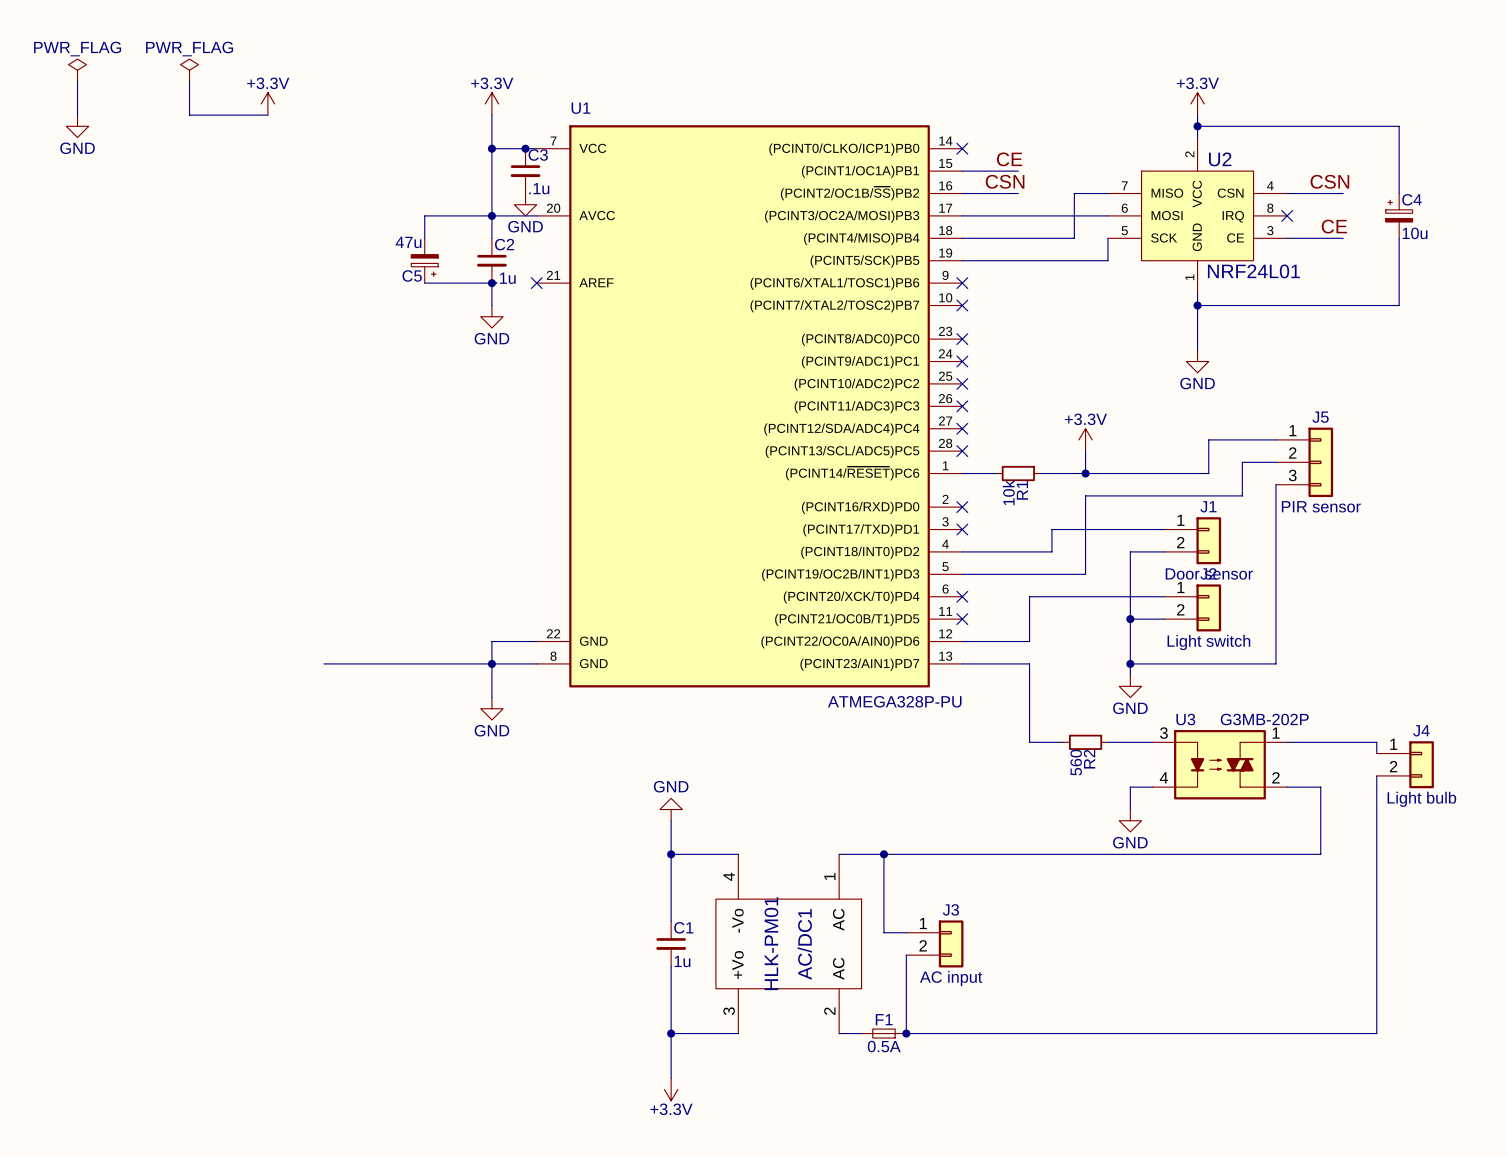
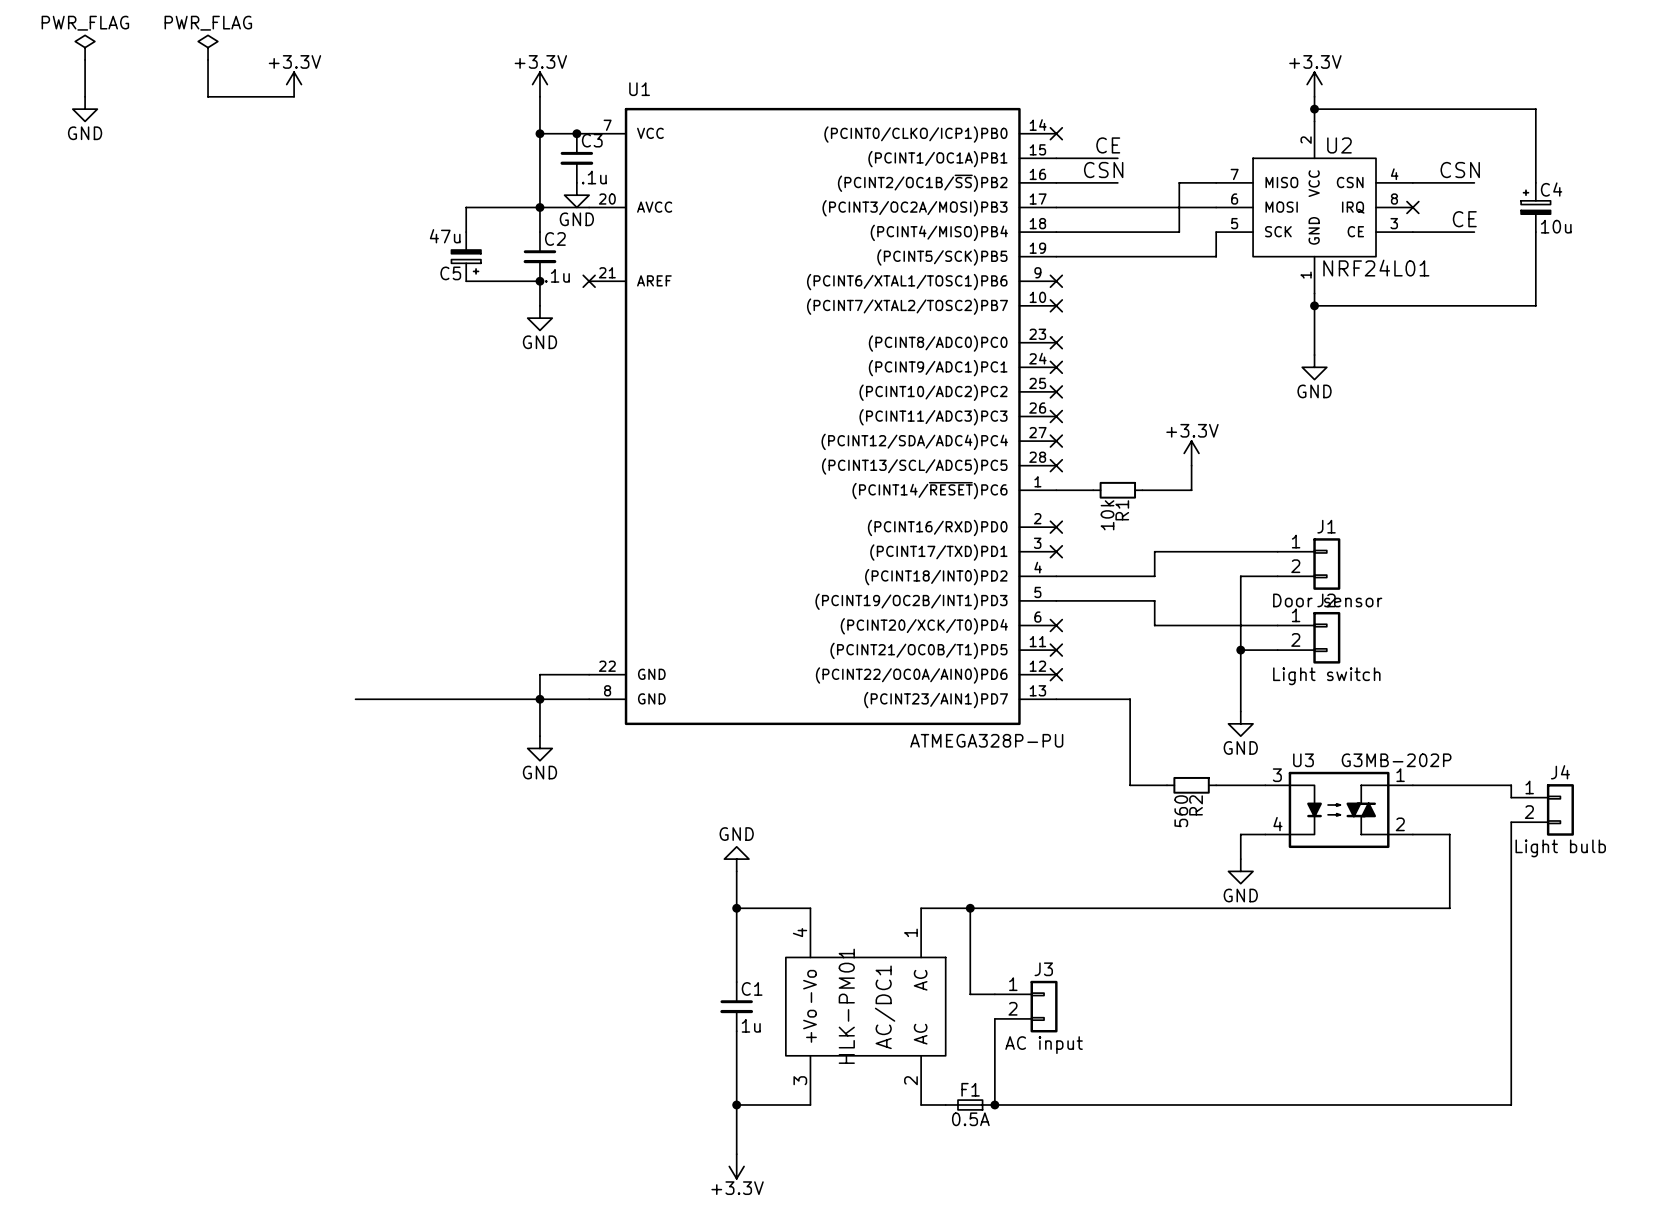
wire: (1275, 439) (1208, 439) (1208, 473) (1085, 473) -> none
wire: (1275, 462) (1242, 462) (1242, 495) (1085, 495) (1085, 574) (1051, 574) -> none
J5: PIR sensor (1304, 462) -> none
junction: (1085, 473) -> none
wire: (1275, 484) (1275, 663) (1130, 663) -> none
wire: (1051, 596) (1029, 596) (1029, 641) (962, 641) -> (1154, 625) (1154, 600)
no-connect mark: none -> (1056, 674)
junction: (1130, 663) -> none

